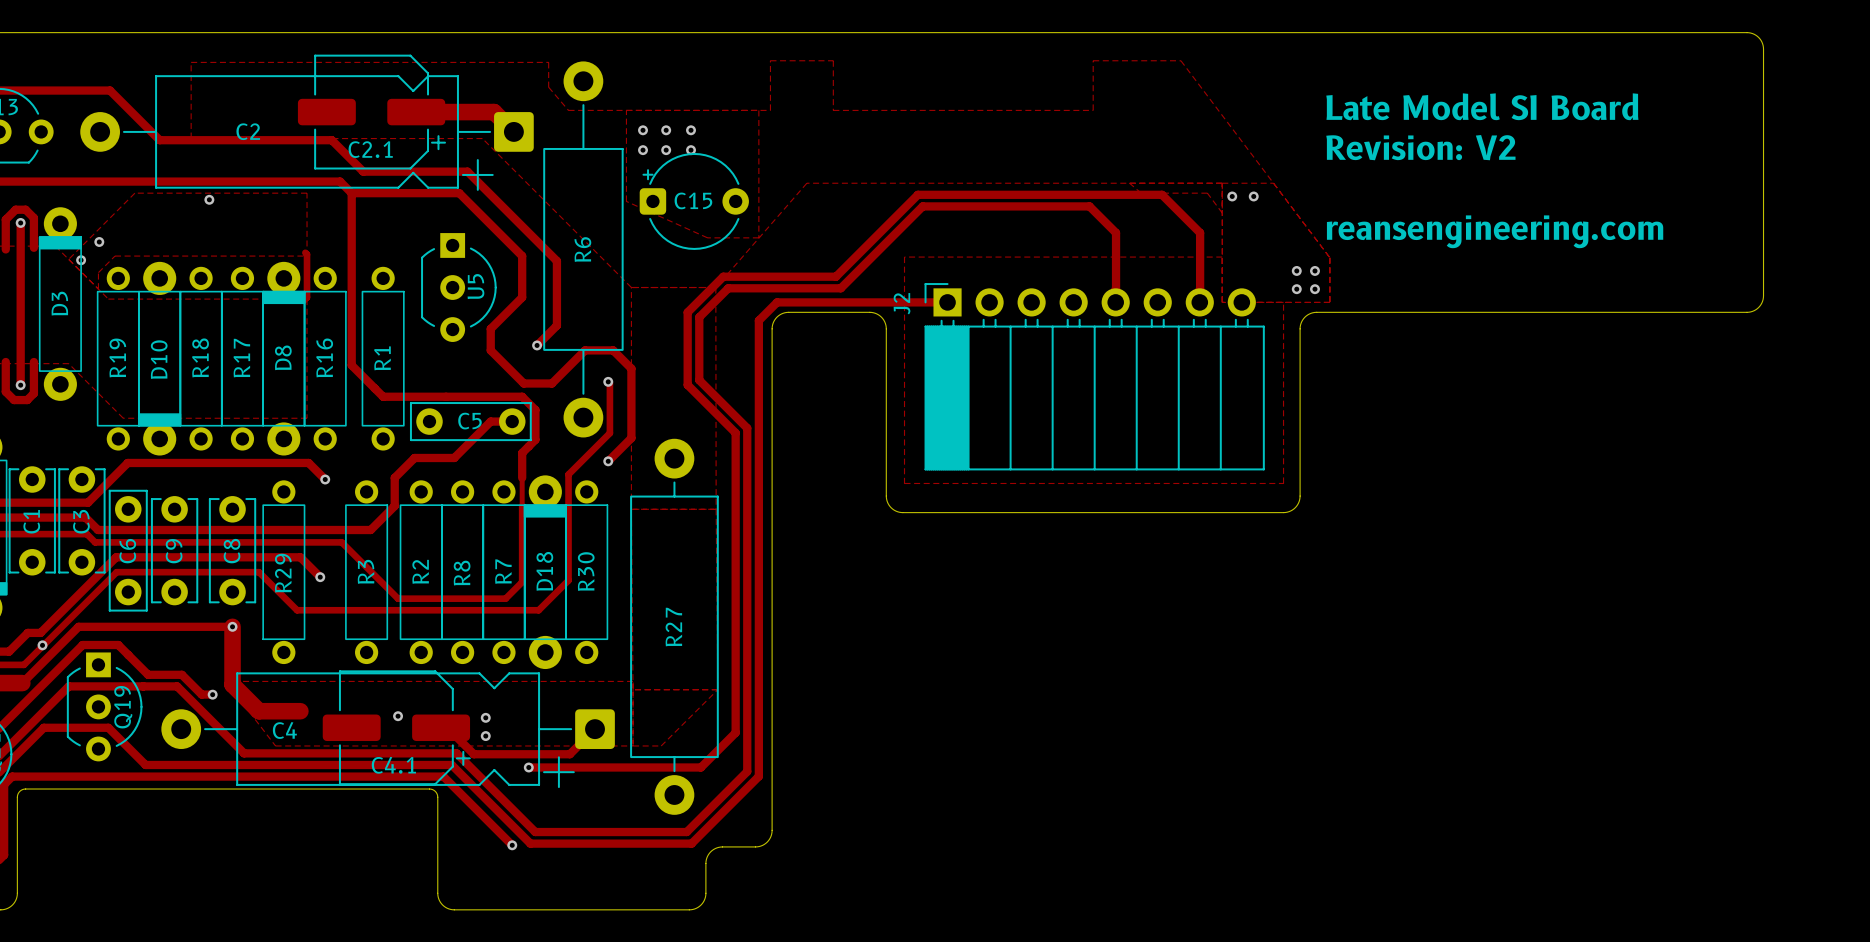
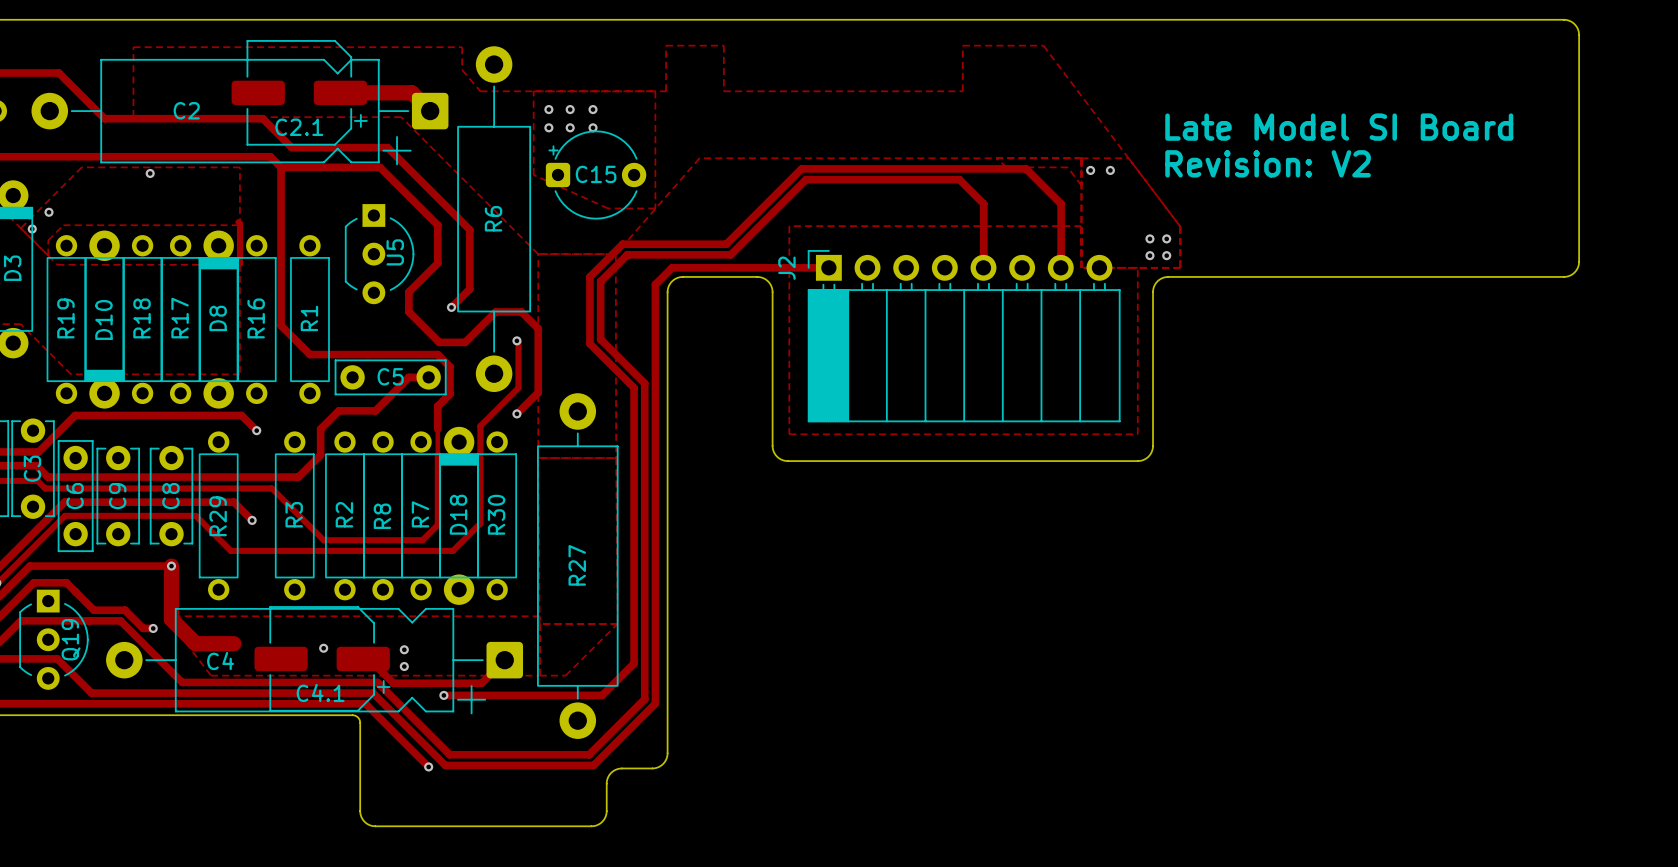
text position: Late Model SI Board (1482, 106) -> Late Model SI Board (1339, 127)
text position: Revision: V2 (1420, 147) -> Revision: V2 (1268, 163)
text: reansengineering.com (1495, 231) -> none

